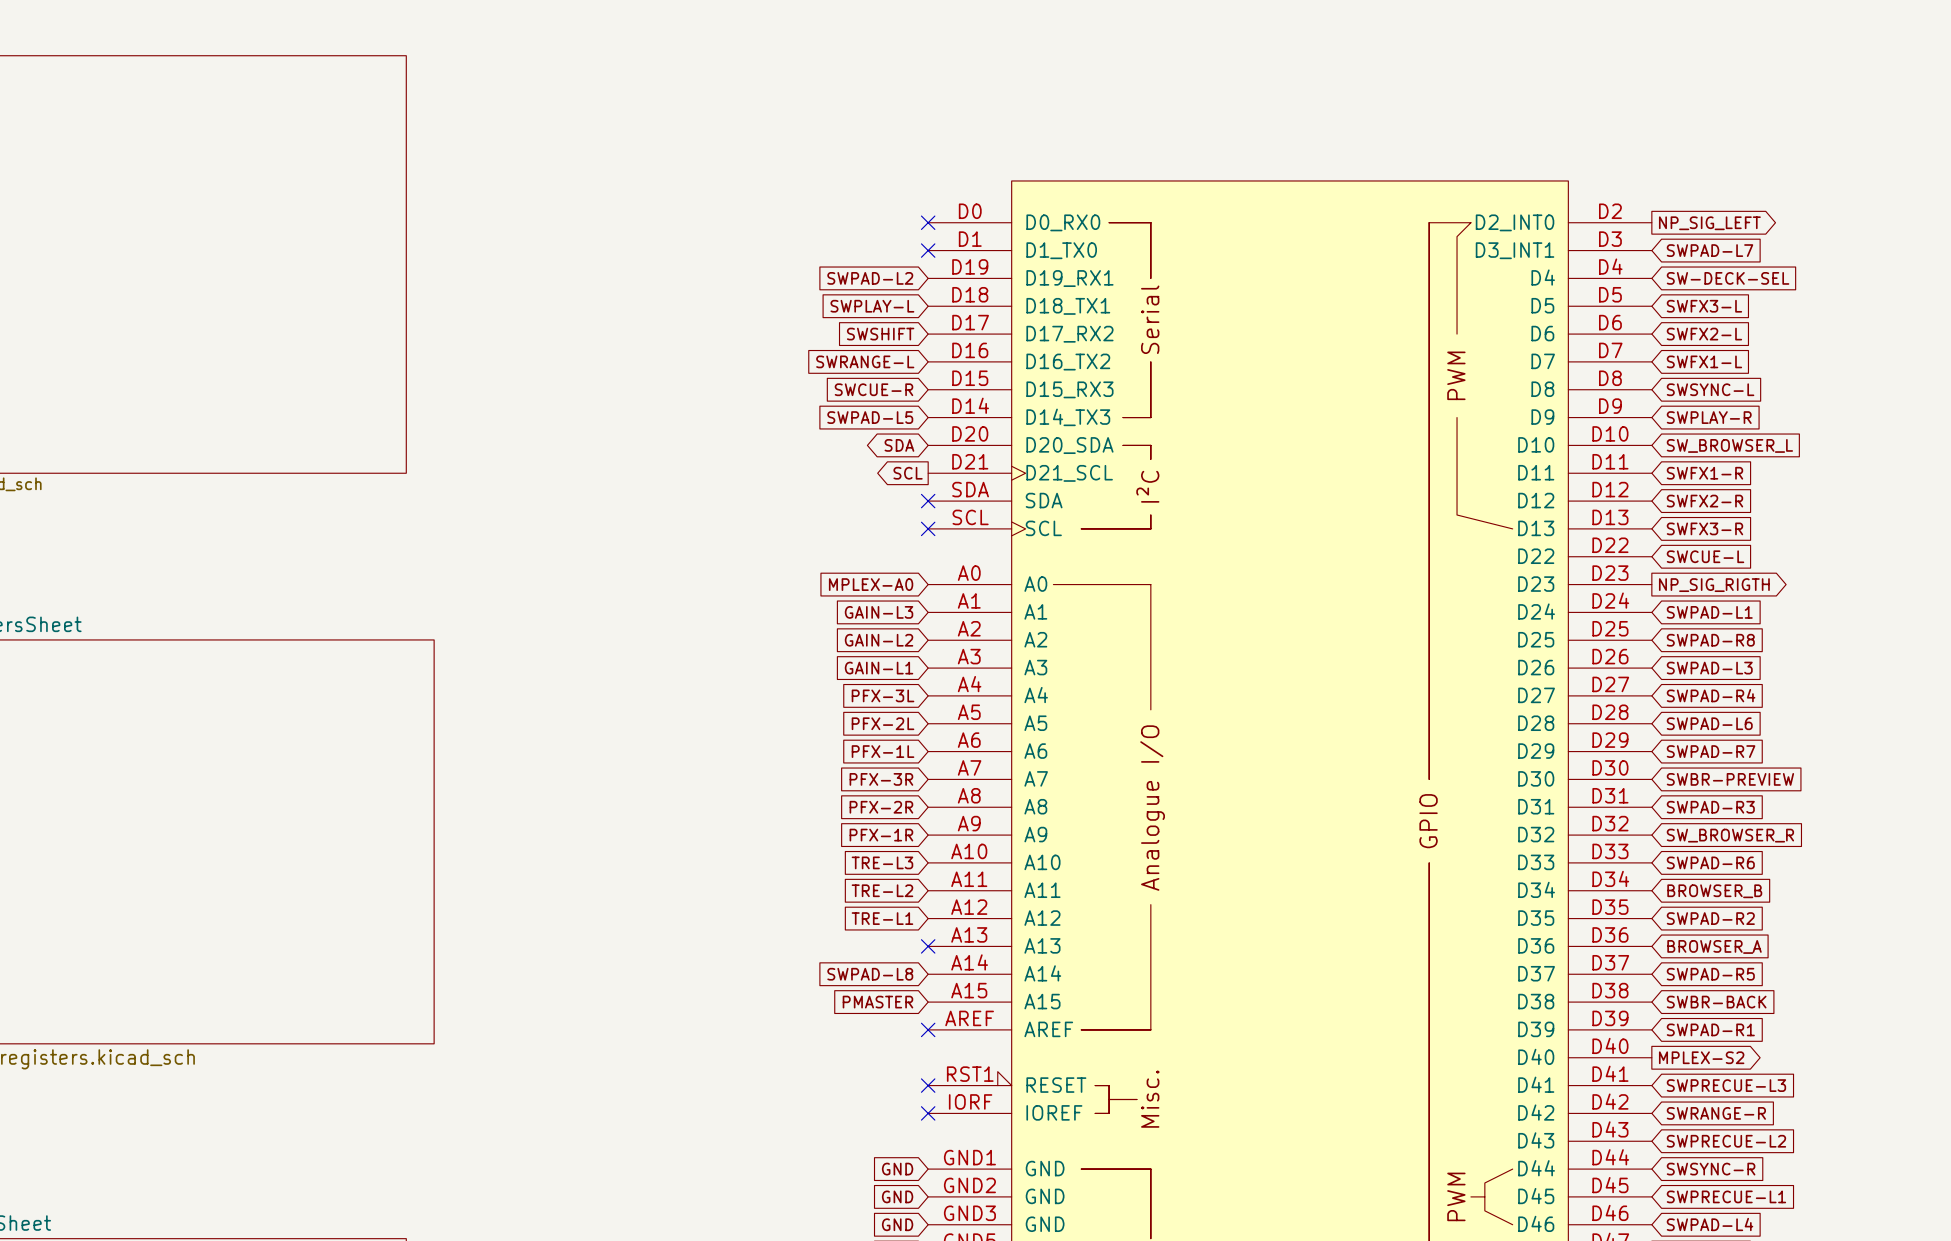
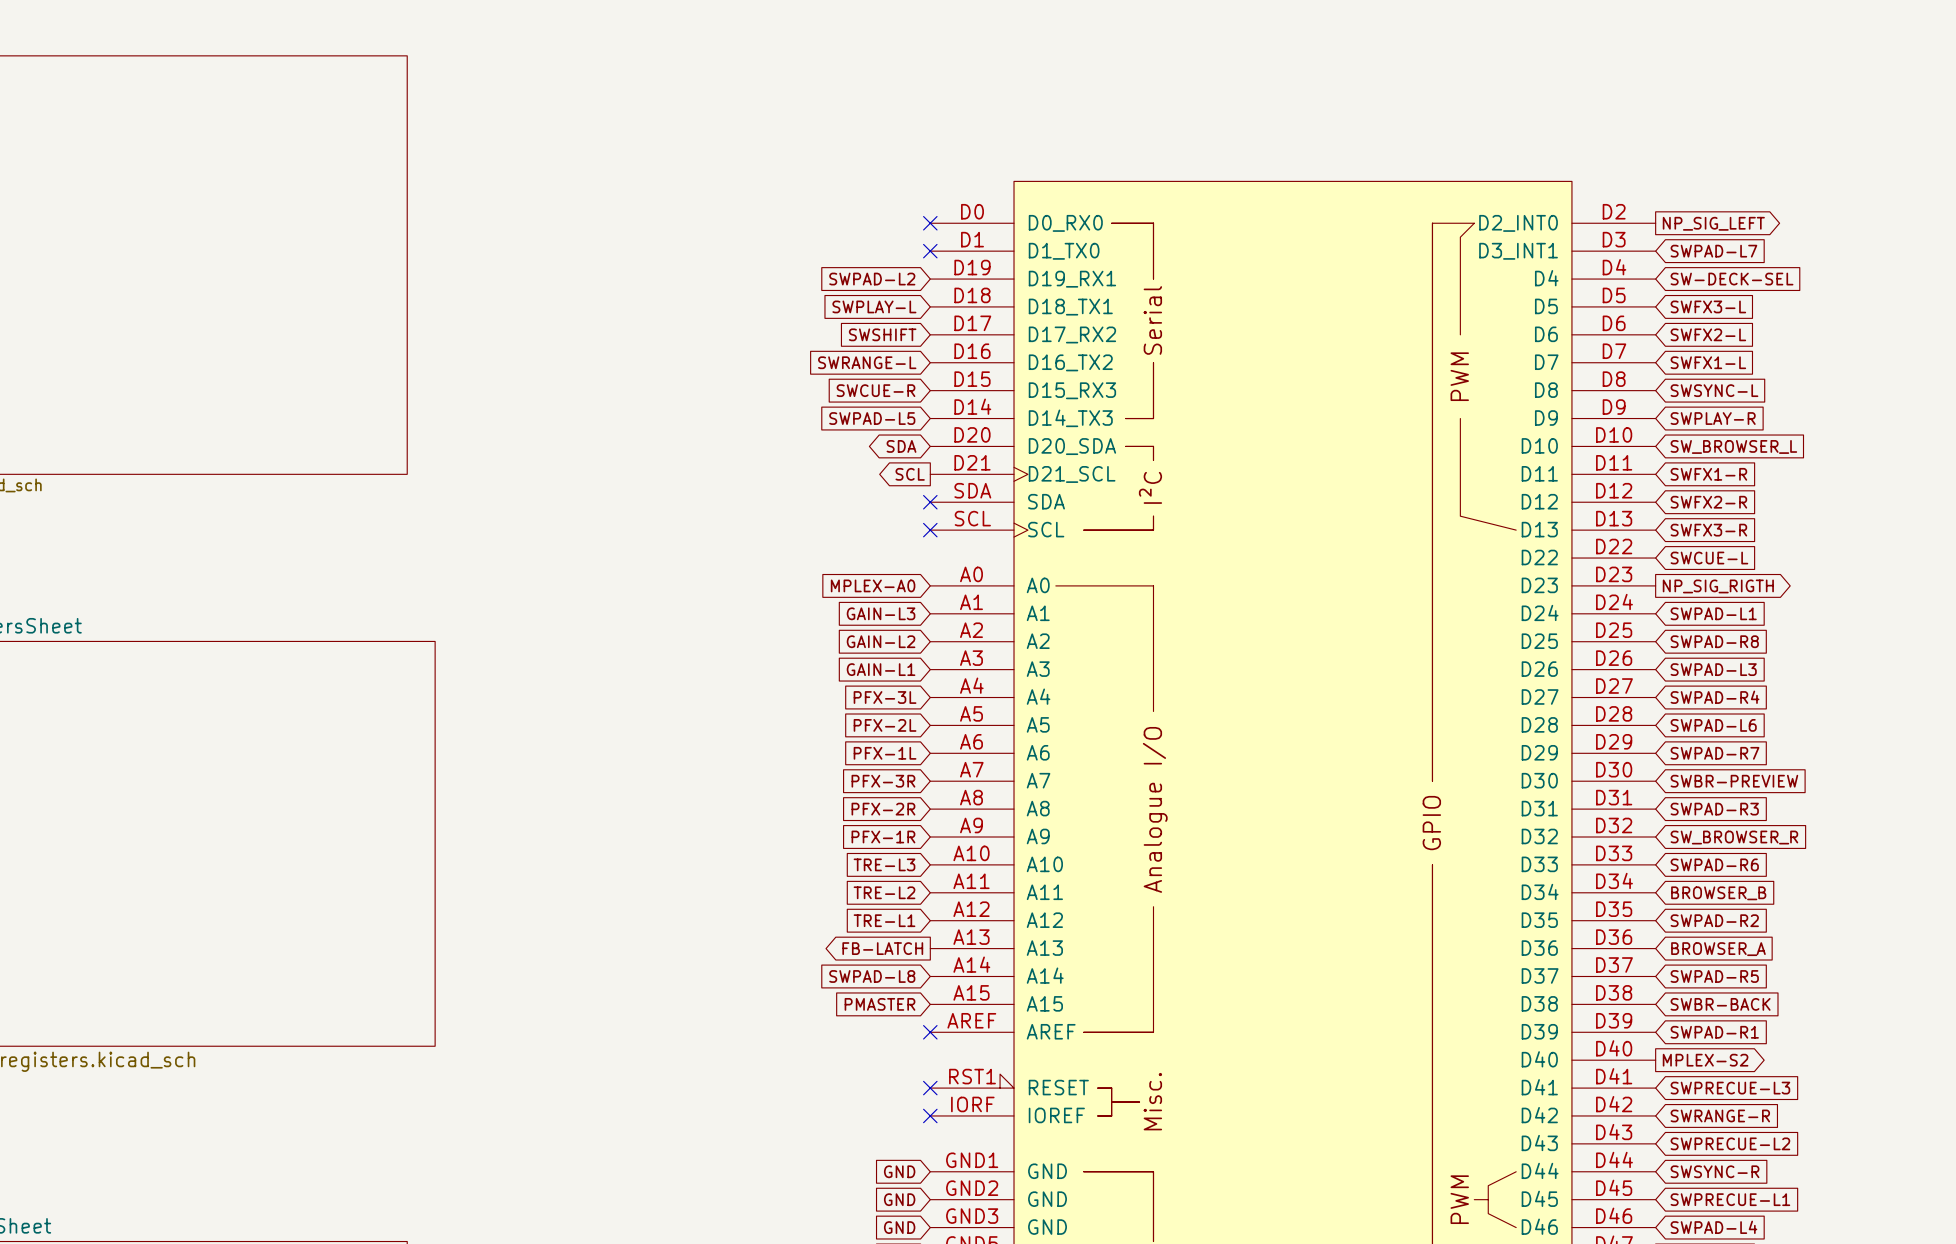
global label: none -> FB-LATCH (882, 948)
no-connect mark: (928, 946) -> none

